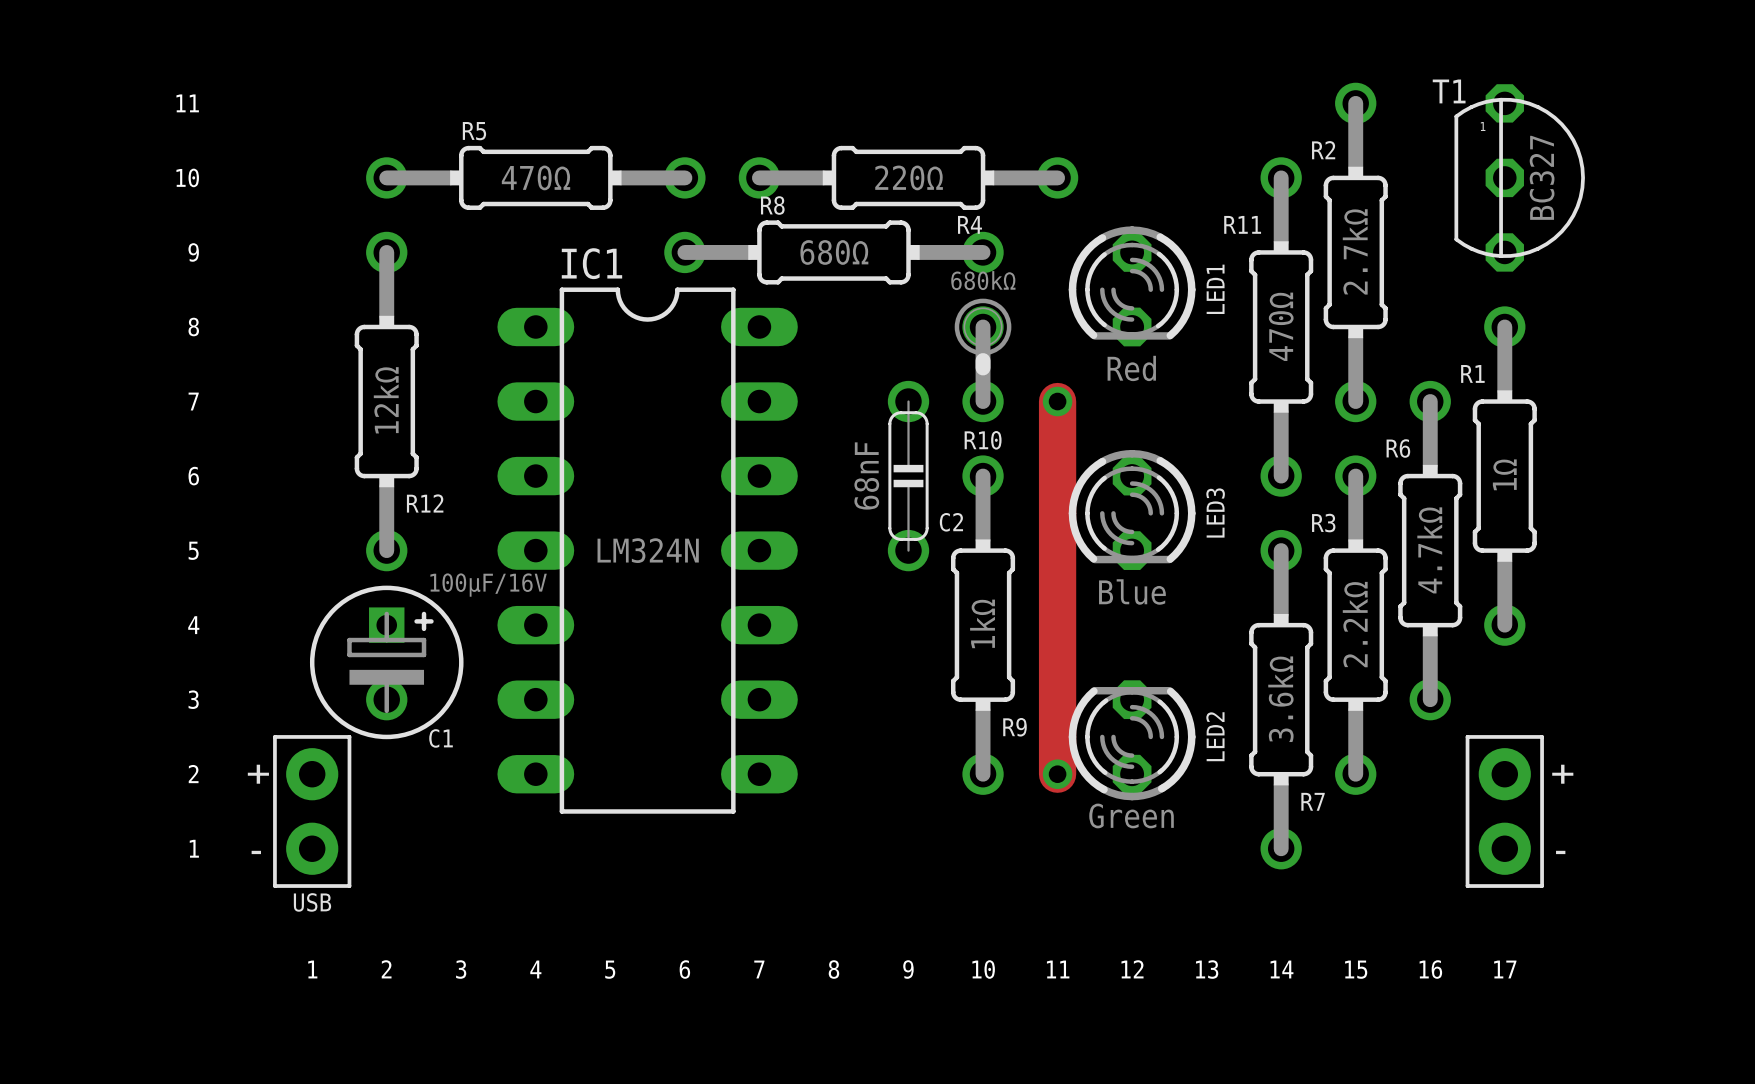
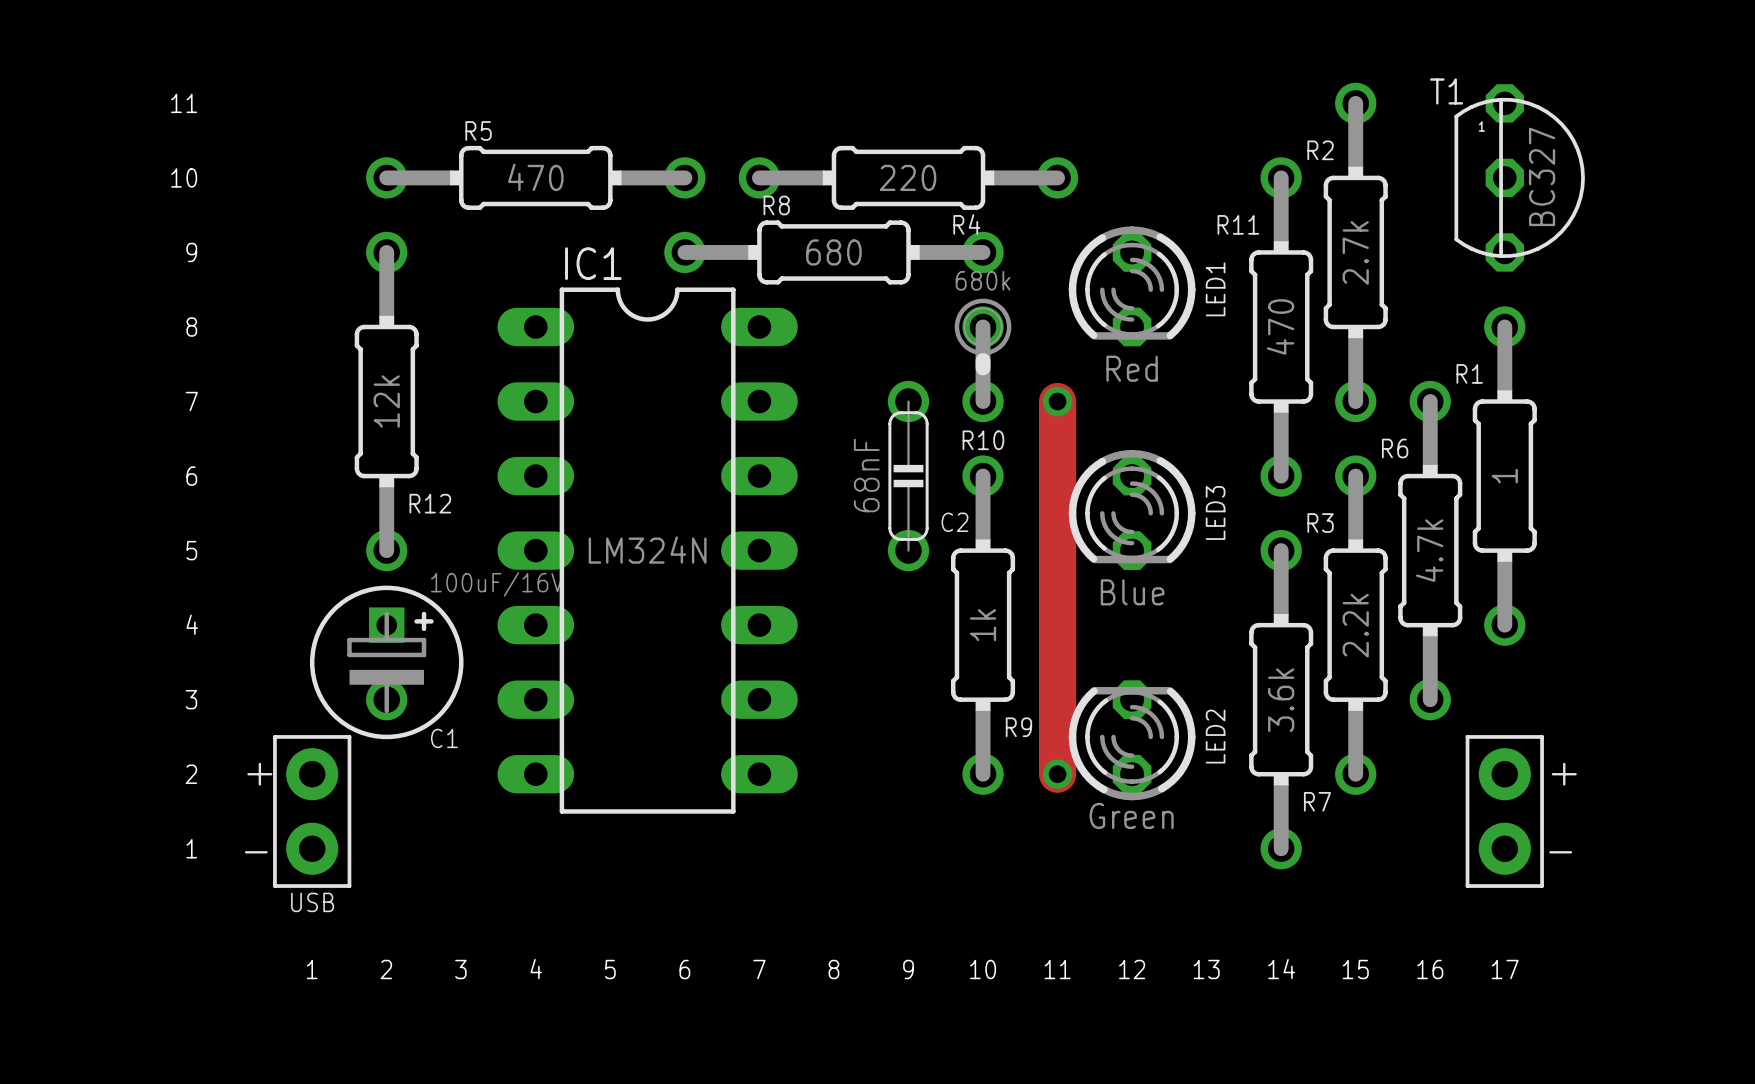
R5 value: 470Ω (536, 177) -> 470 (535, 177)
R4 value: 220Ω (909, 177) -> 220 (907, 177)
R2 value: 2.7kΩ (1355, 251) -> 2.7k (1355, 252)
R8 value: 680Ω (834, 252) -> 680 (833, 252)
R10 value: 680kΩ (983, 280) -> 680k (983, 280)
R11 value: 470Ω (1281, 326) -> 470 (1280, 326)
R12 value: 12kΩ (386, 400) -> 12k (386, 401)
R1 value: 1Ω (1504, 474) -> 1 (1504, 476)
R6 value: 4.7kΩ (1429, 550) -> 4.7k (1429, 550)
C1 value: 100μF/16V (488, 585) -> 100uF/16V (497, 584)
R9 value: 1kΩ (982, 623) -> 1k (983, 625)
R3 value: 2.2kΩ (1355, 624) -> 2.2k (1355, 625)
R7 value: 3.6kΩ (1280, 699) -> 3.6k (1281, 700)

